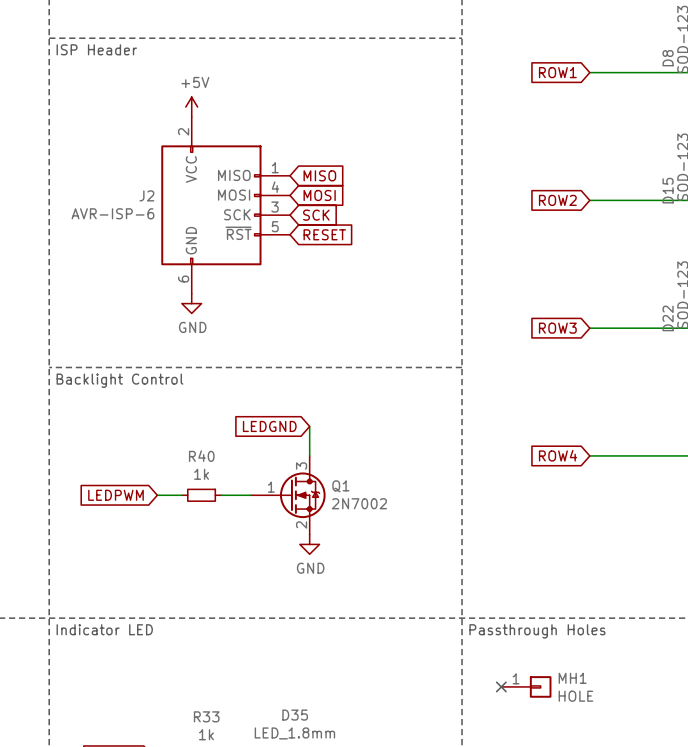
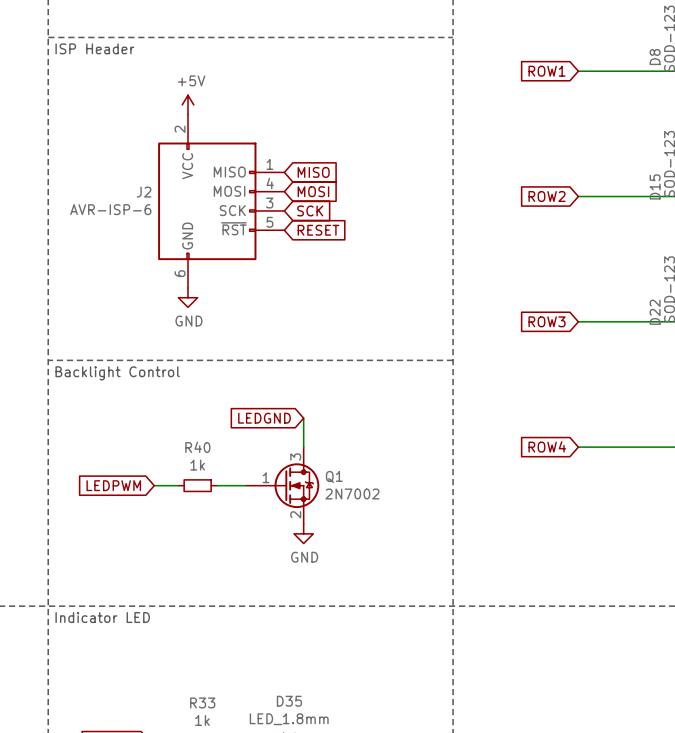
text: Passthrough Holes (537, 631) -> none
no-connect mark: (501, 686) -> none
MH1: HOLE (526, 686) -> none

